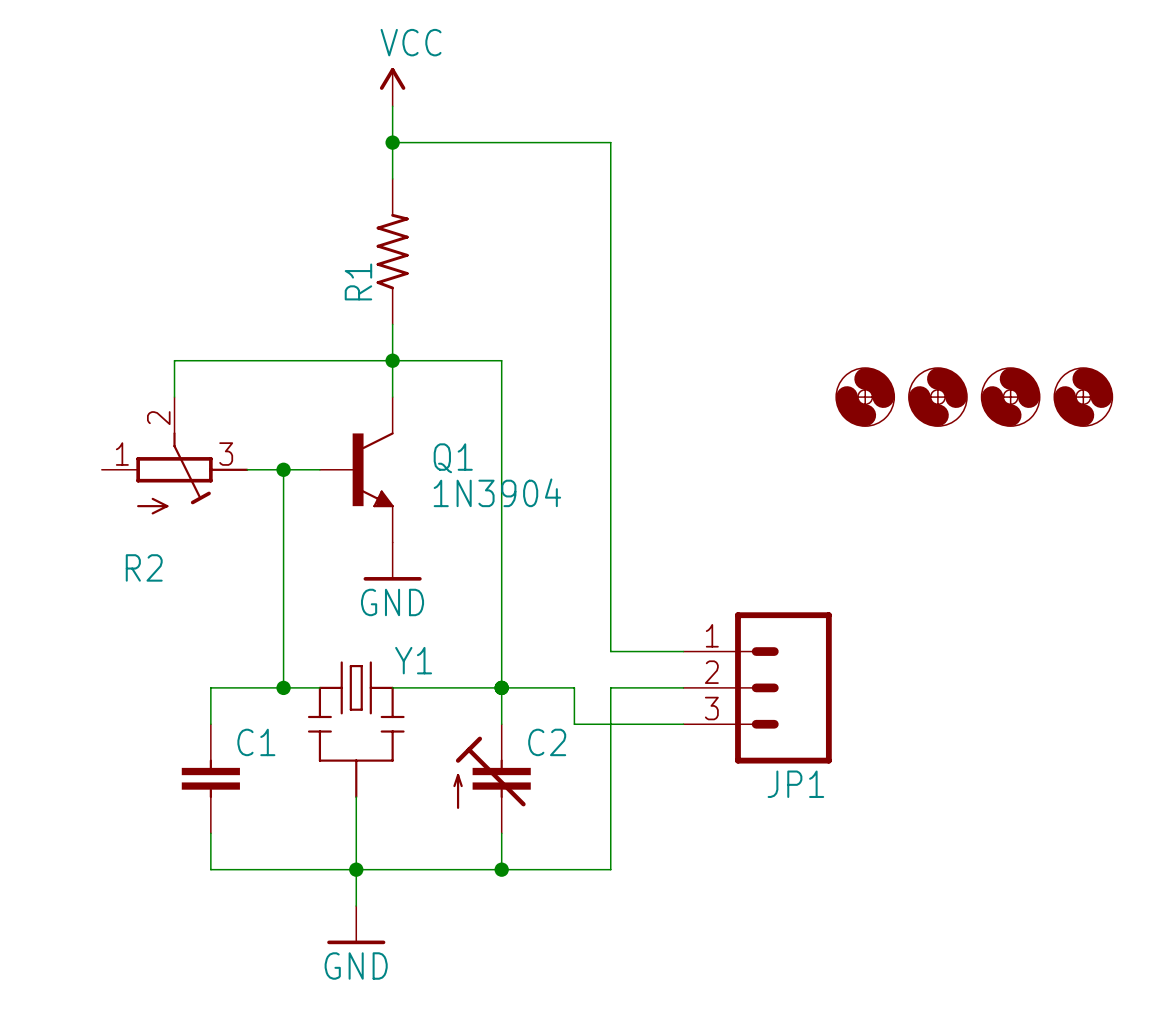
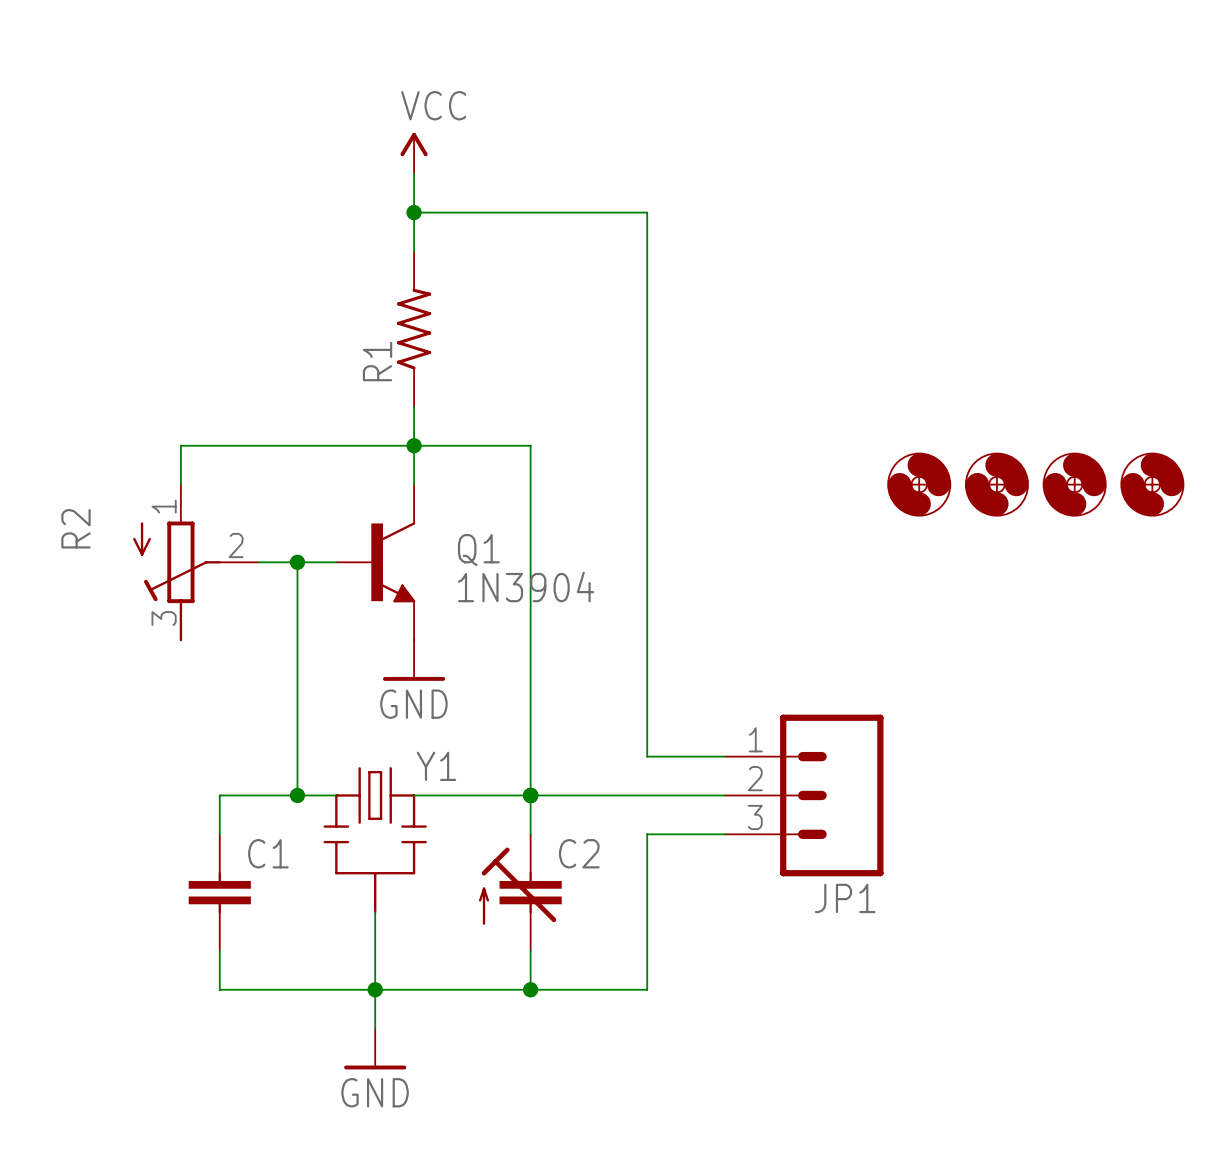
R2 rotation: 0° (192, 473) -> 90° clockwise (177, 581)
wire: (574, 687) (574, 724) (610, 724) (610, 687) -> (608, 795) (647, 795)

